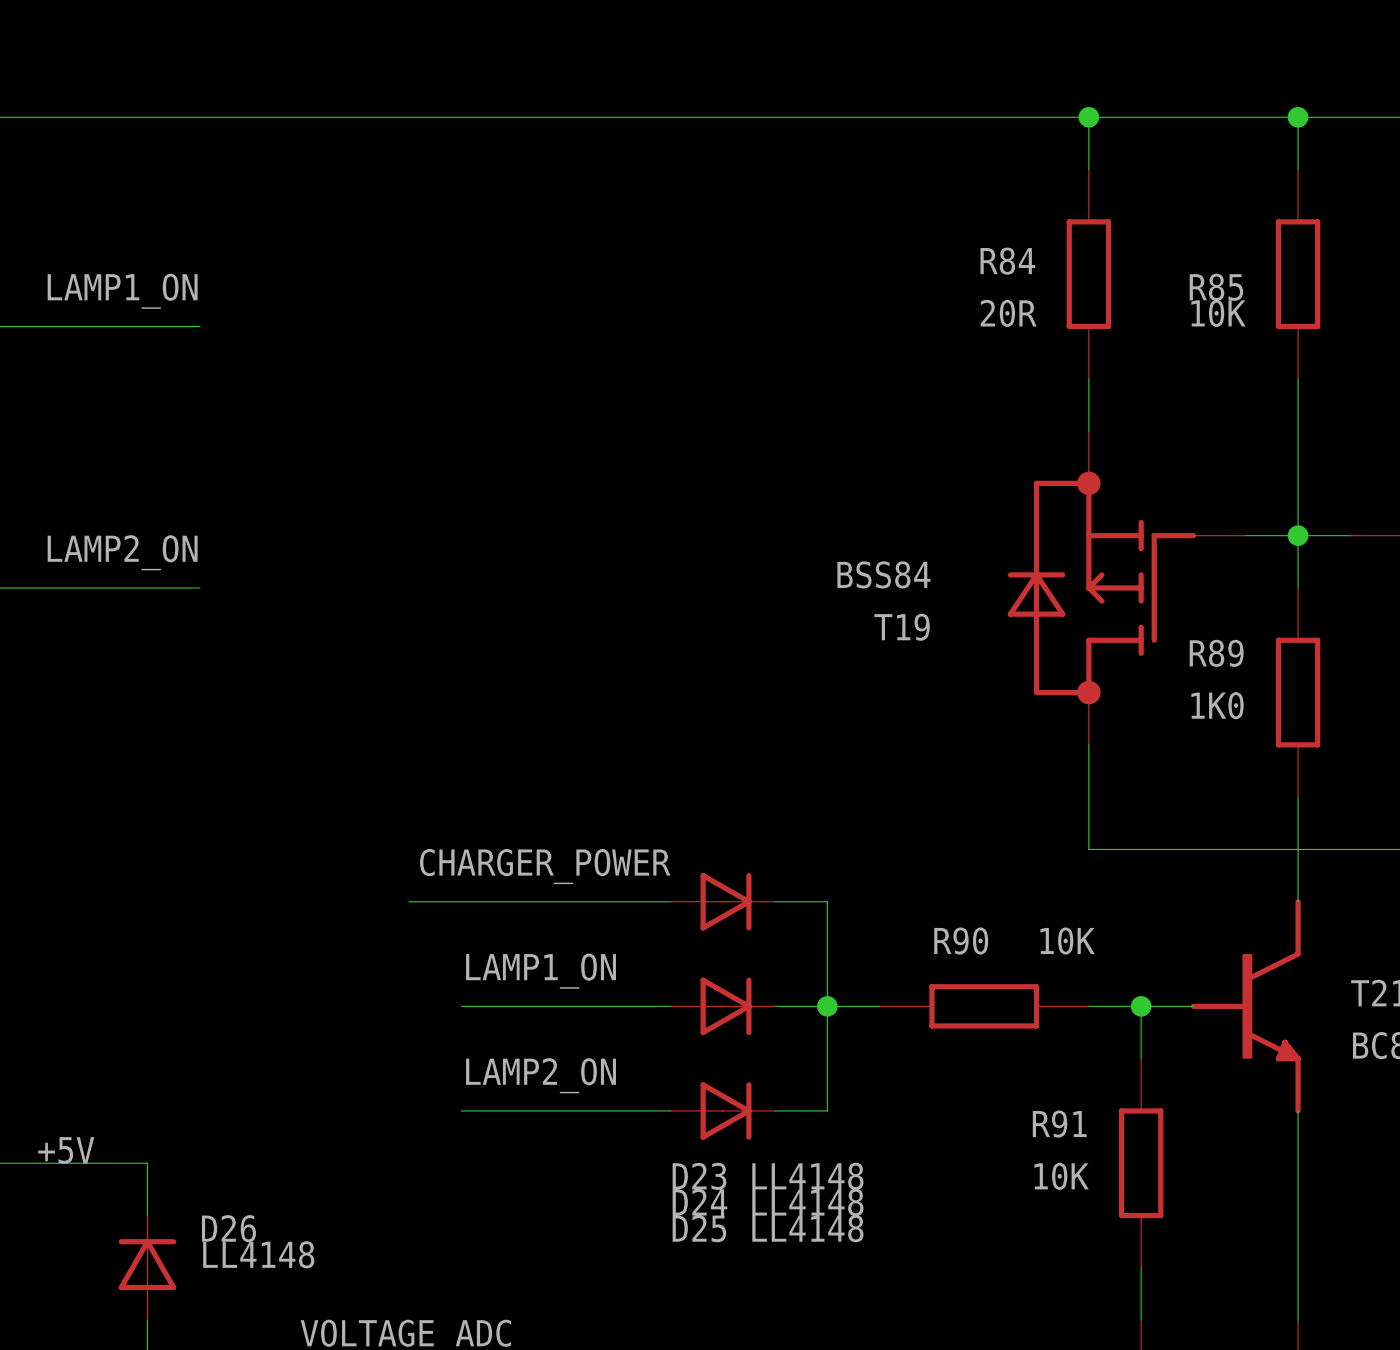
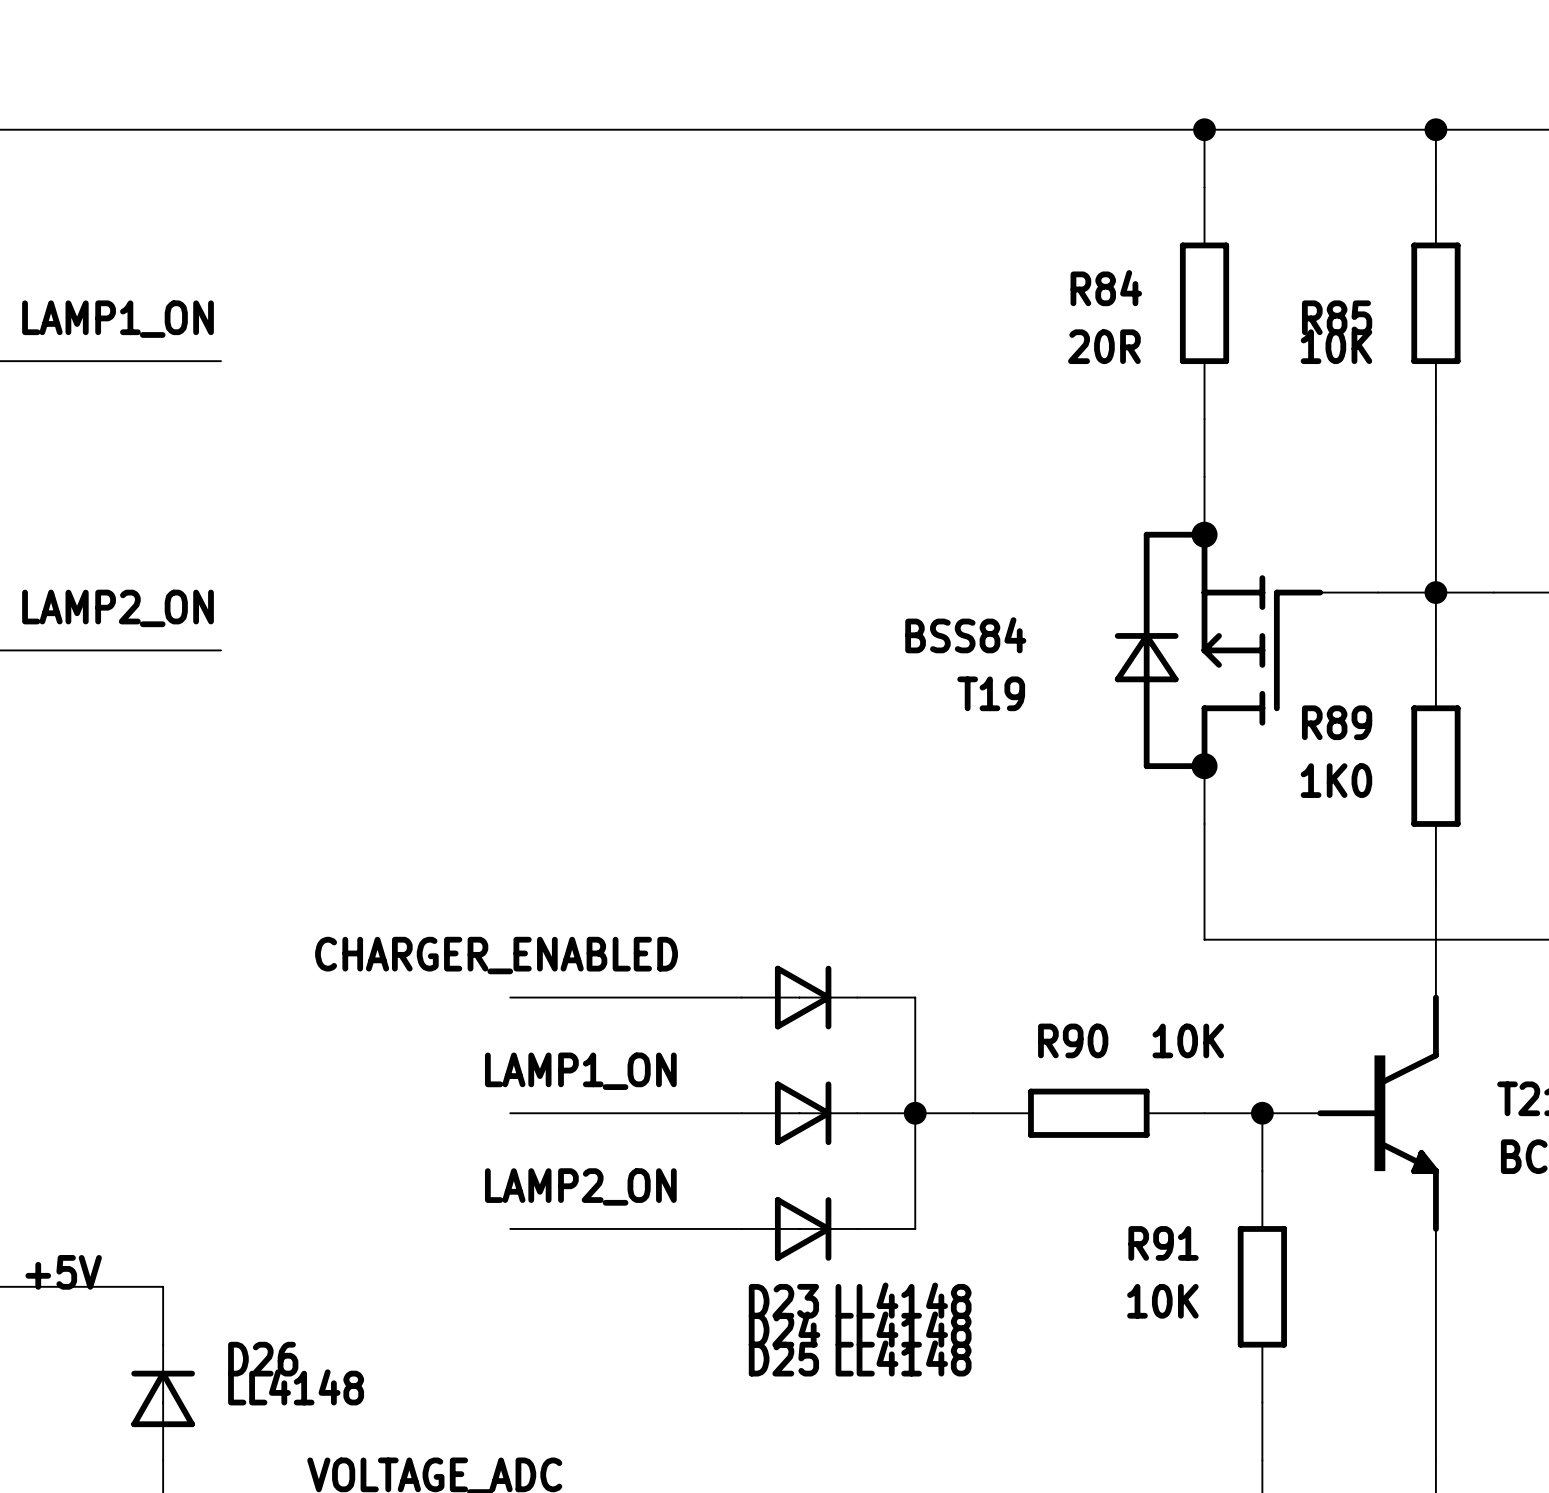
label: CHARGER_POWER (545, 866) -> CHARGER_ENABLED (496, 955)
wire: (408, 901) (461, 901) -> none

